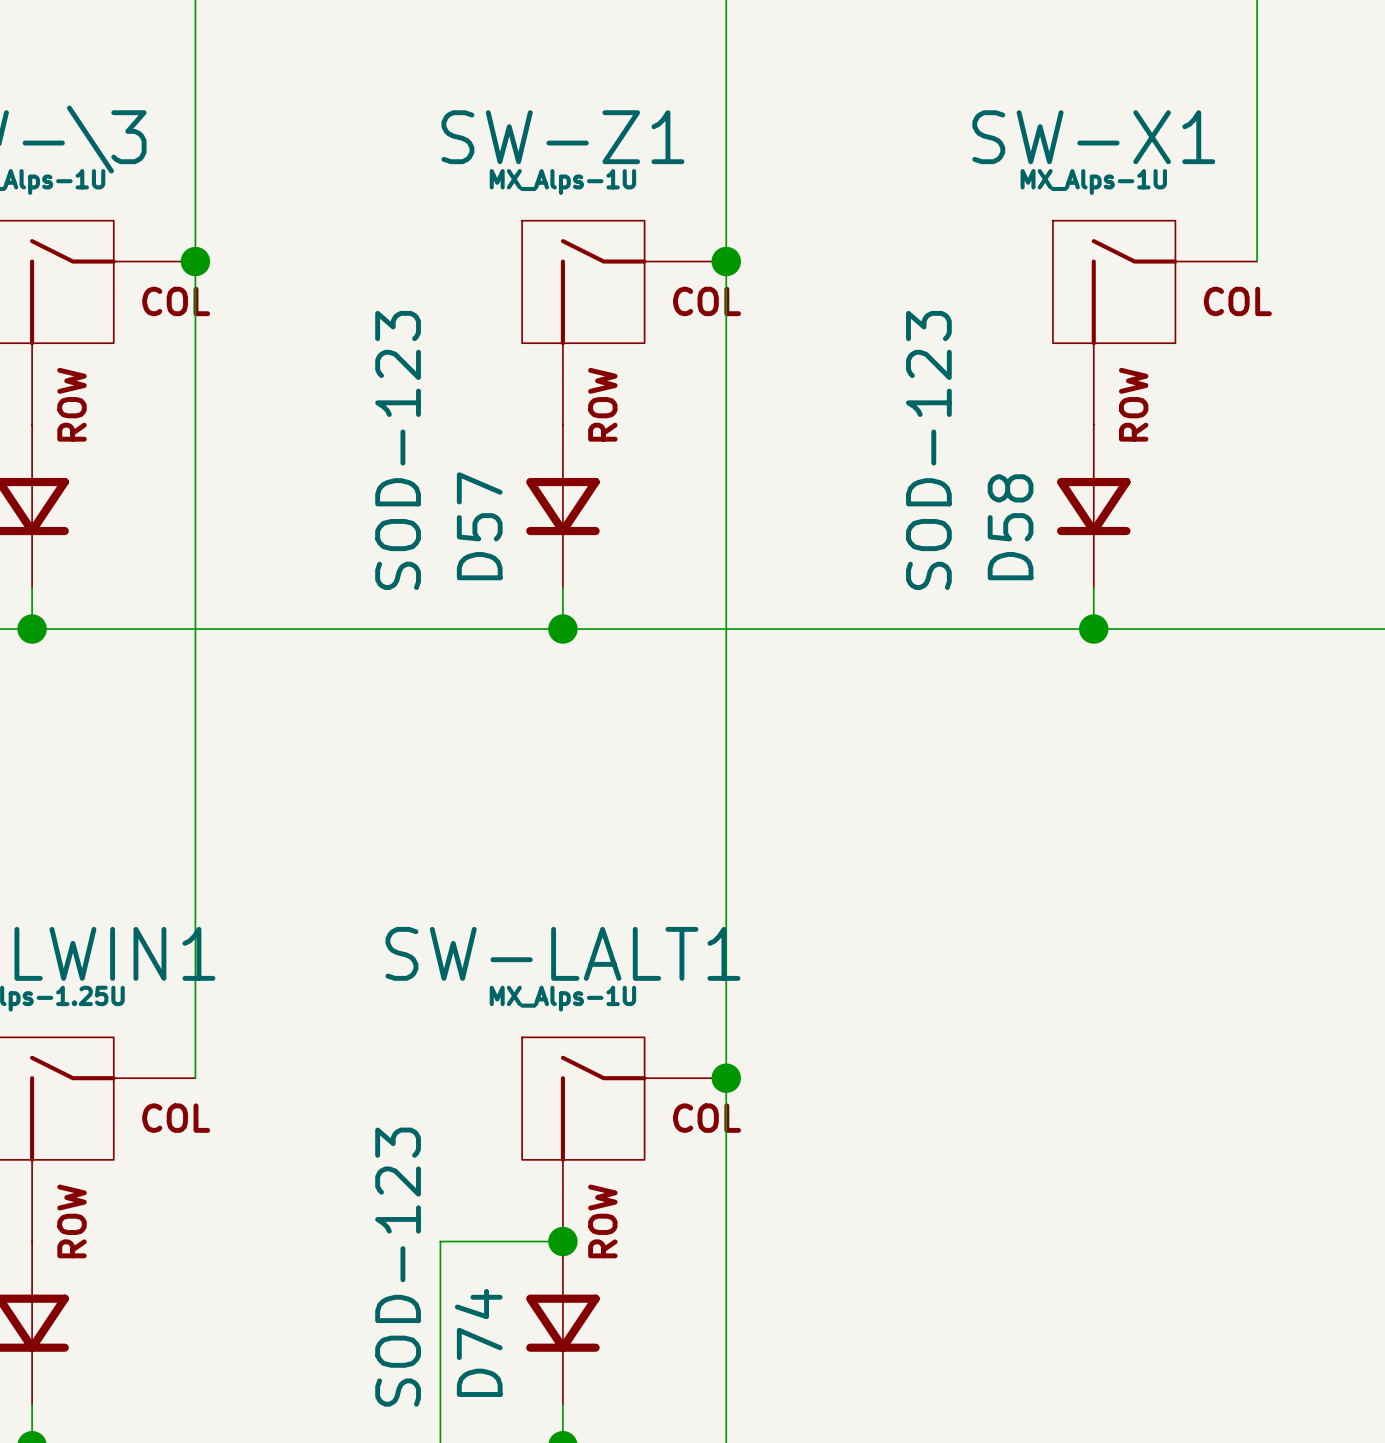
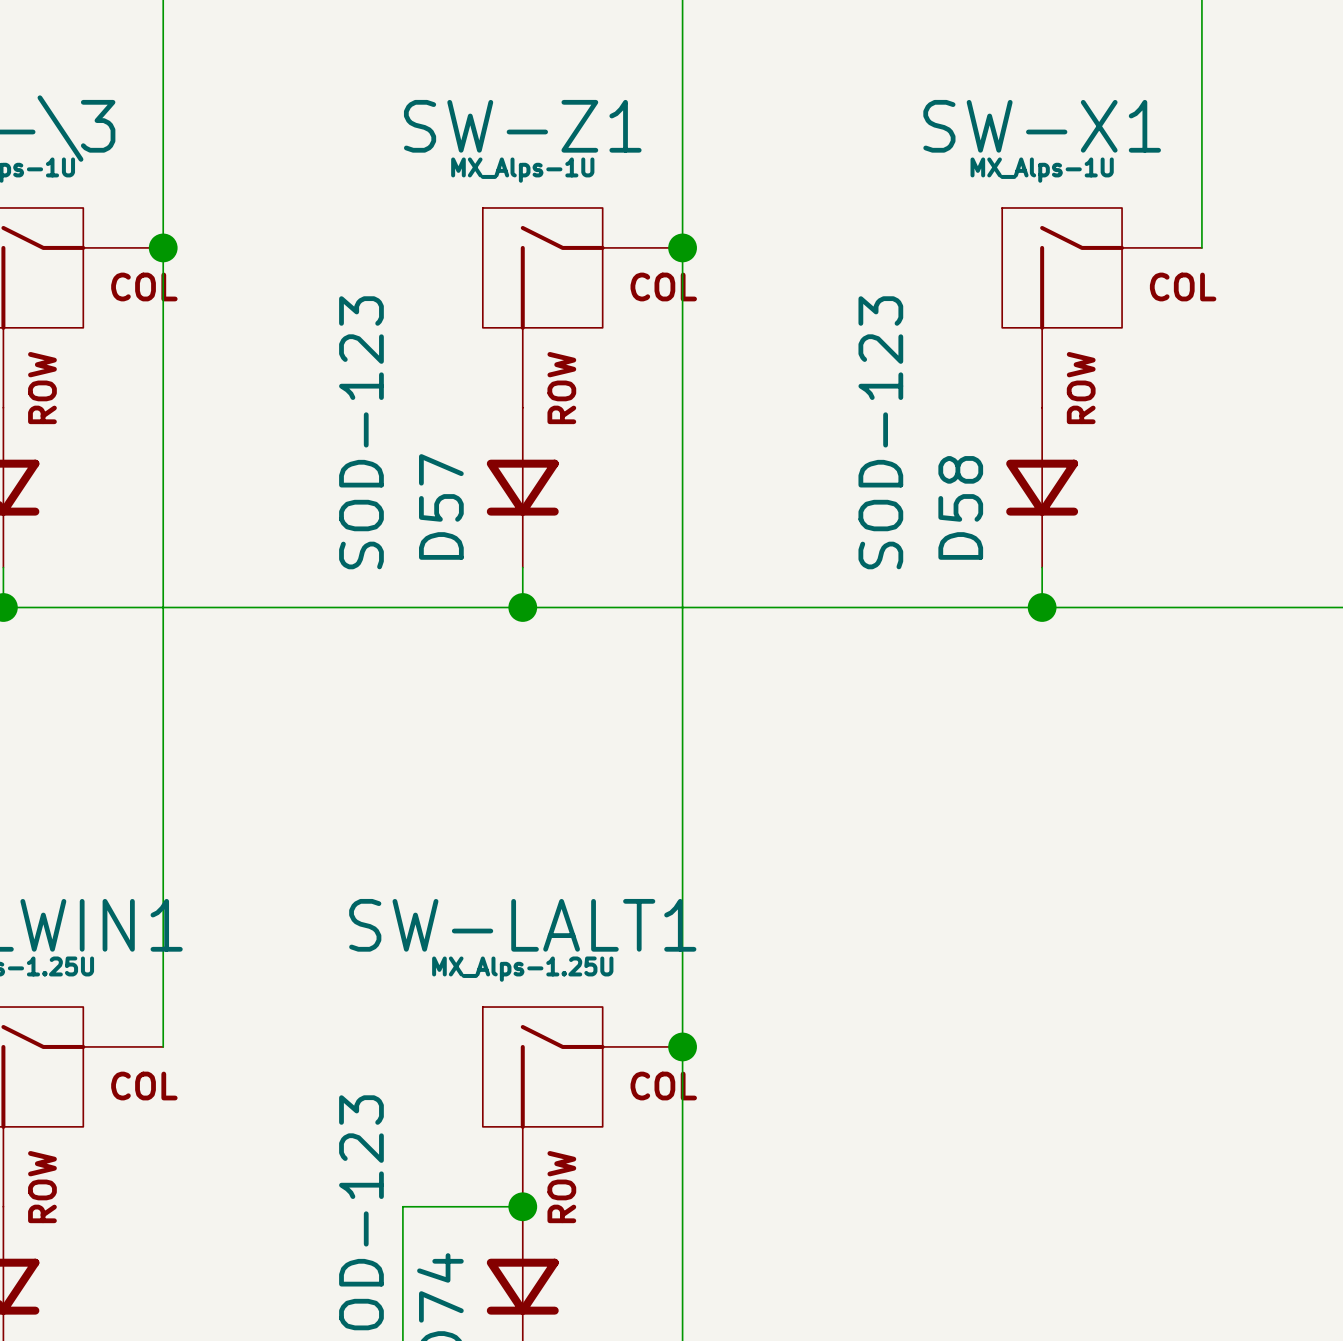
SW-LALT1 value: MX_Alps-1U (562, 998) -> MX_Alps-1.25U (522, 969)

